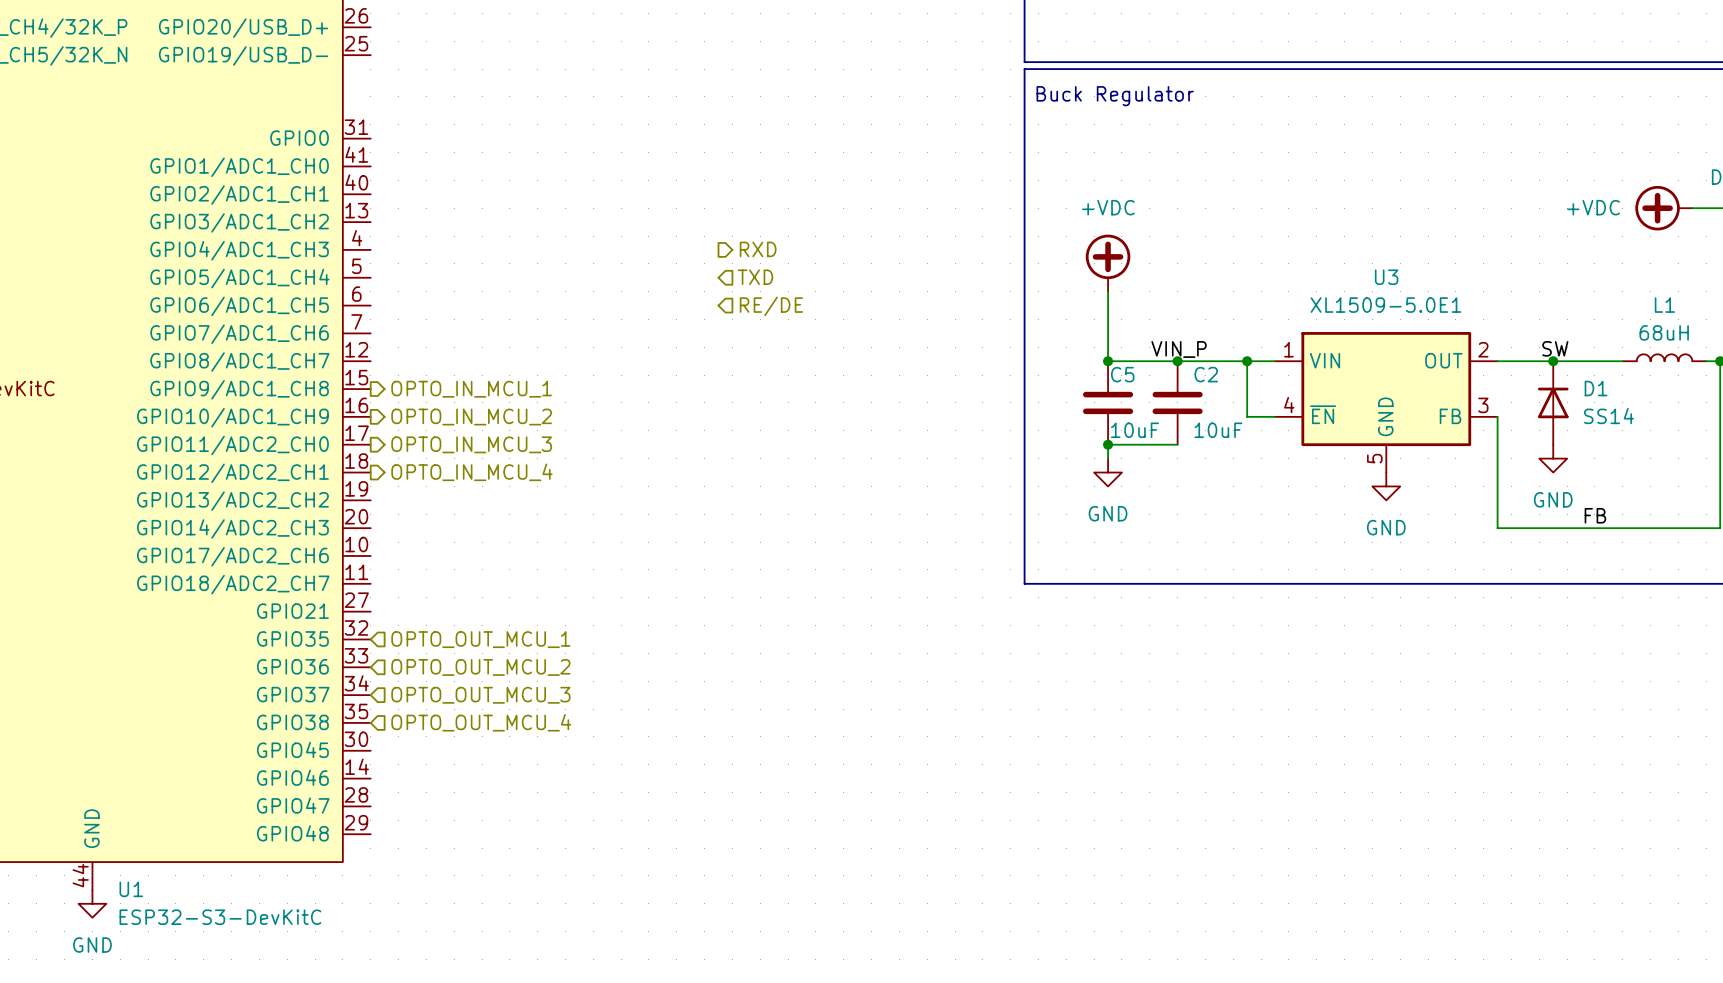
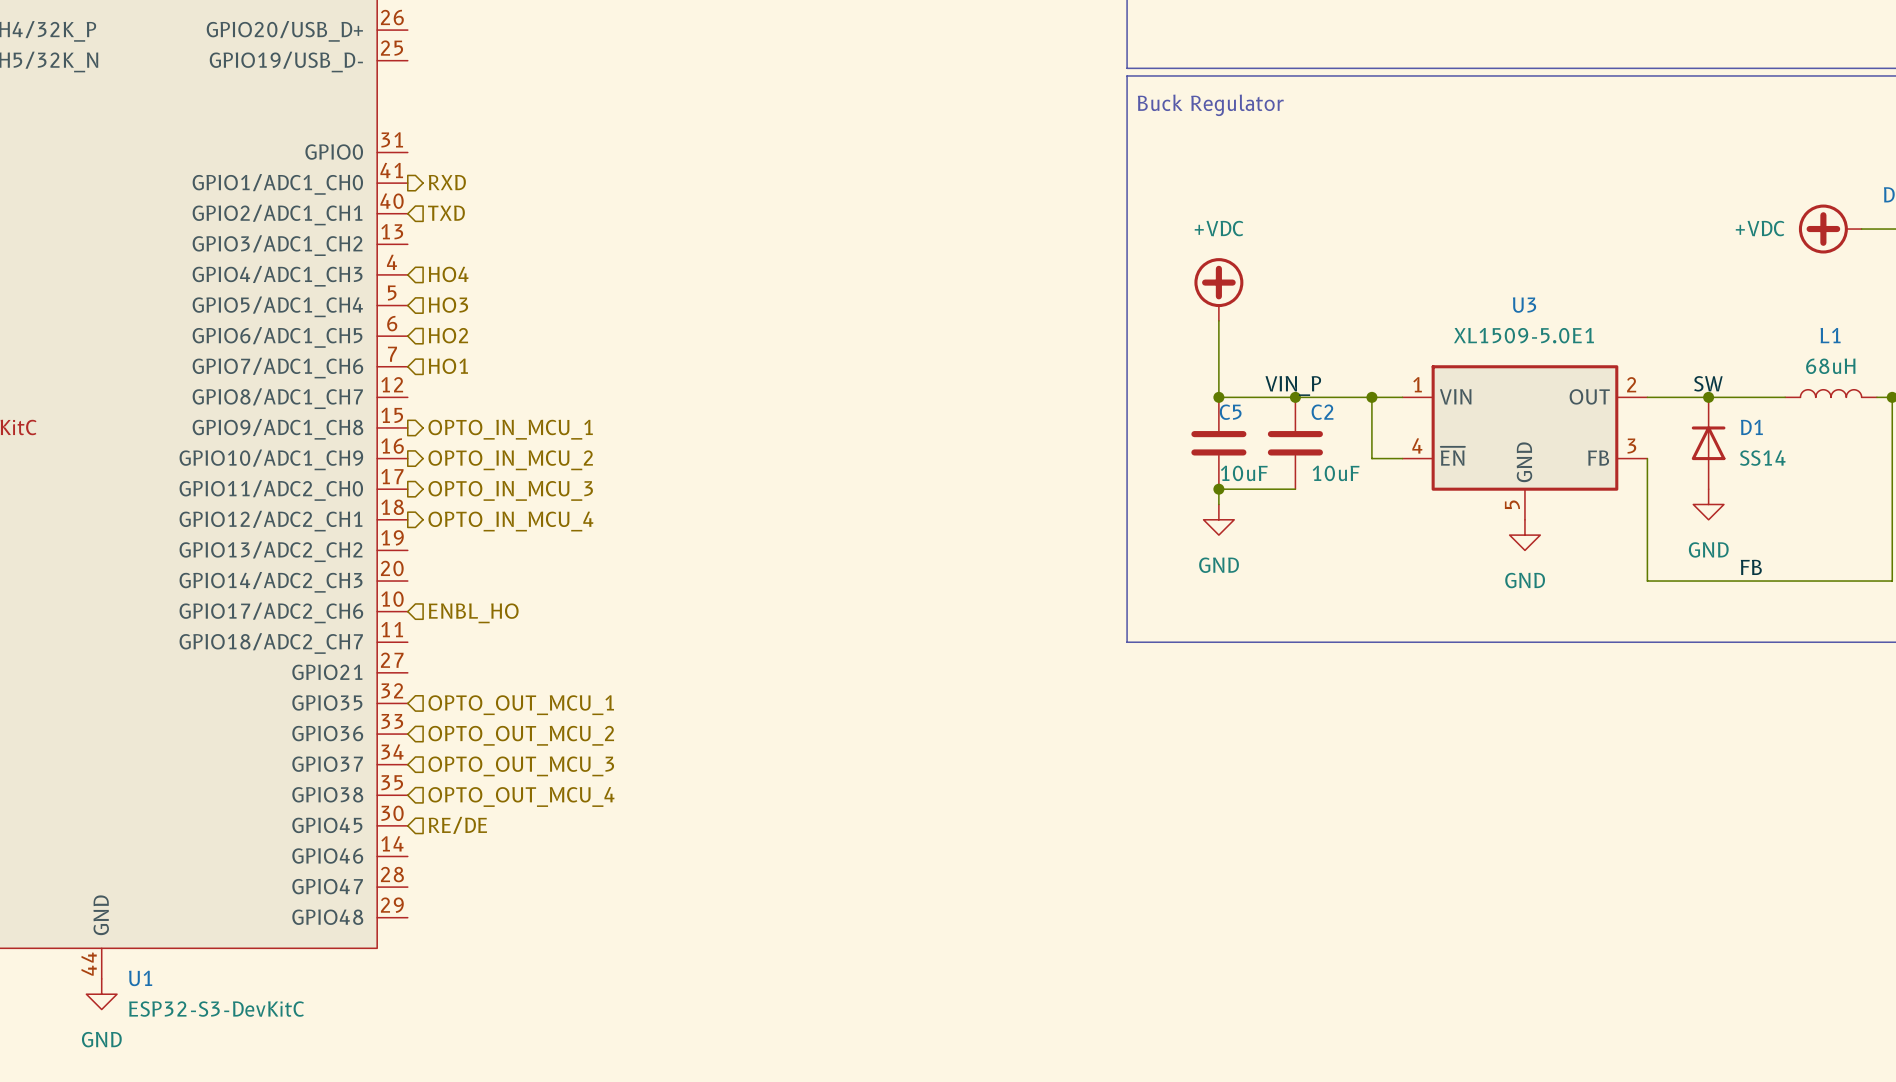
hierarchical label: none -> RXD (447, 182)
hierarchical label: none -> TXD (446, 213)
hierarchical label: none -> HO4 (448, 274)
hierarchical label: RXD (758, 249) -> none
hierarchical label: none -> HO3 (448, 305)
hierarchical label: TXD (755, 277) -> none
hierarchical label: none -> HO2 (448, 335)
hierarchical label: RE/DE (771, 306) -> none
hierarchical label: none -> HO1 (448, 366)
hierarchical label: none -> ENBL_HO (473, 613)
hierarchical label: none -> RE/DE (457, 825)

